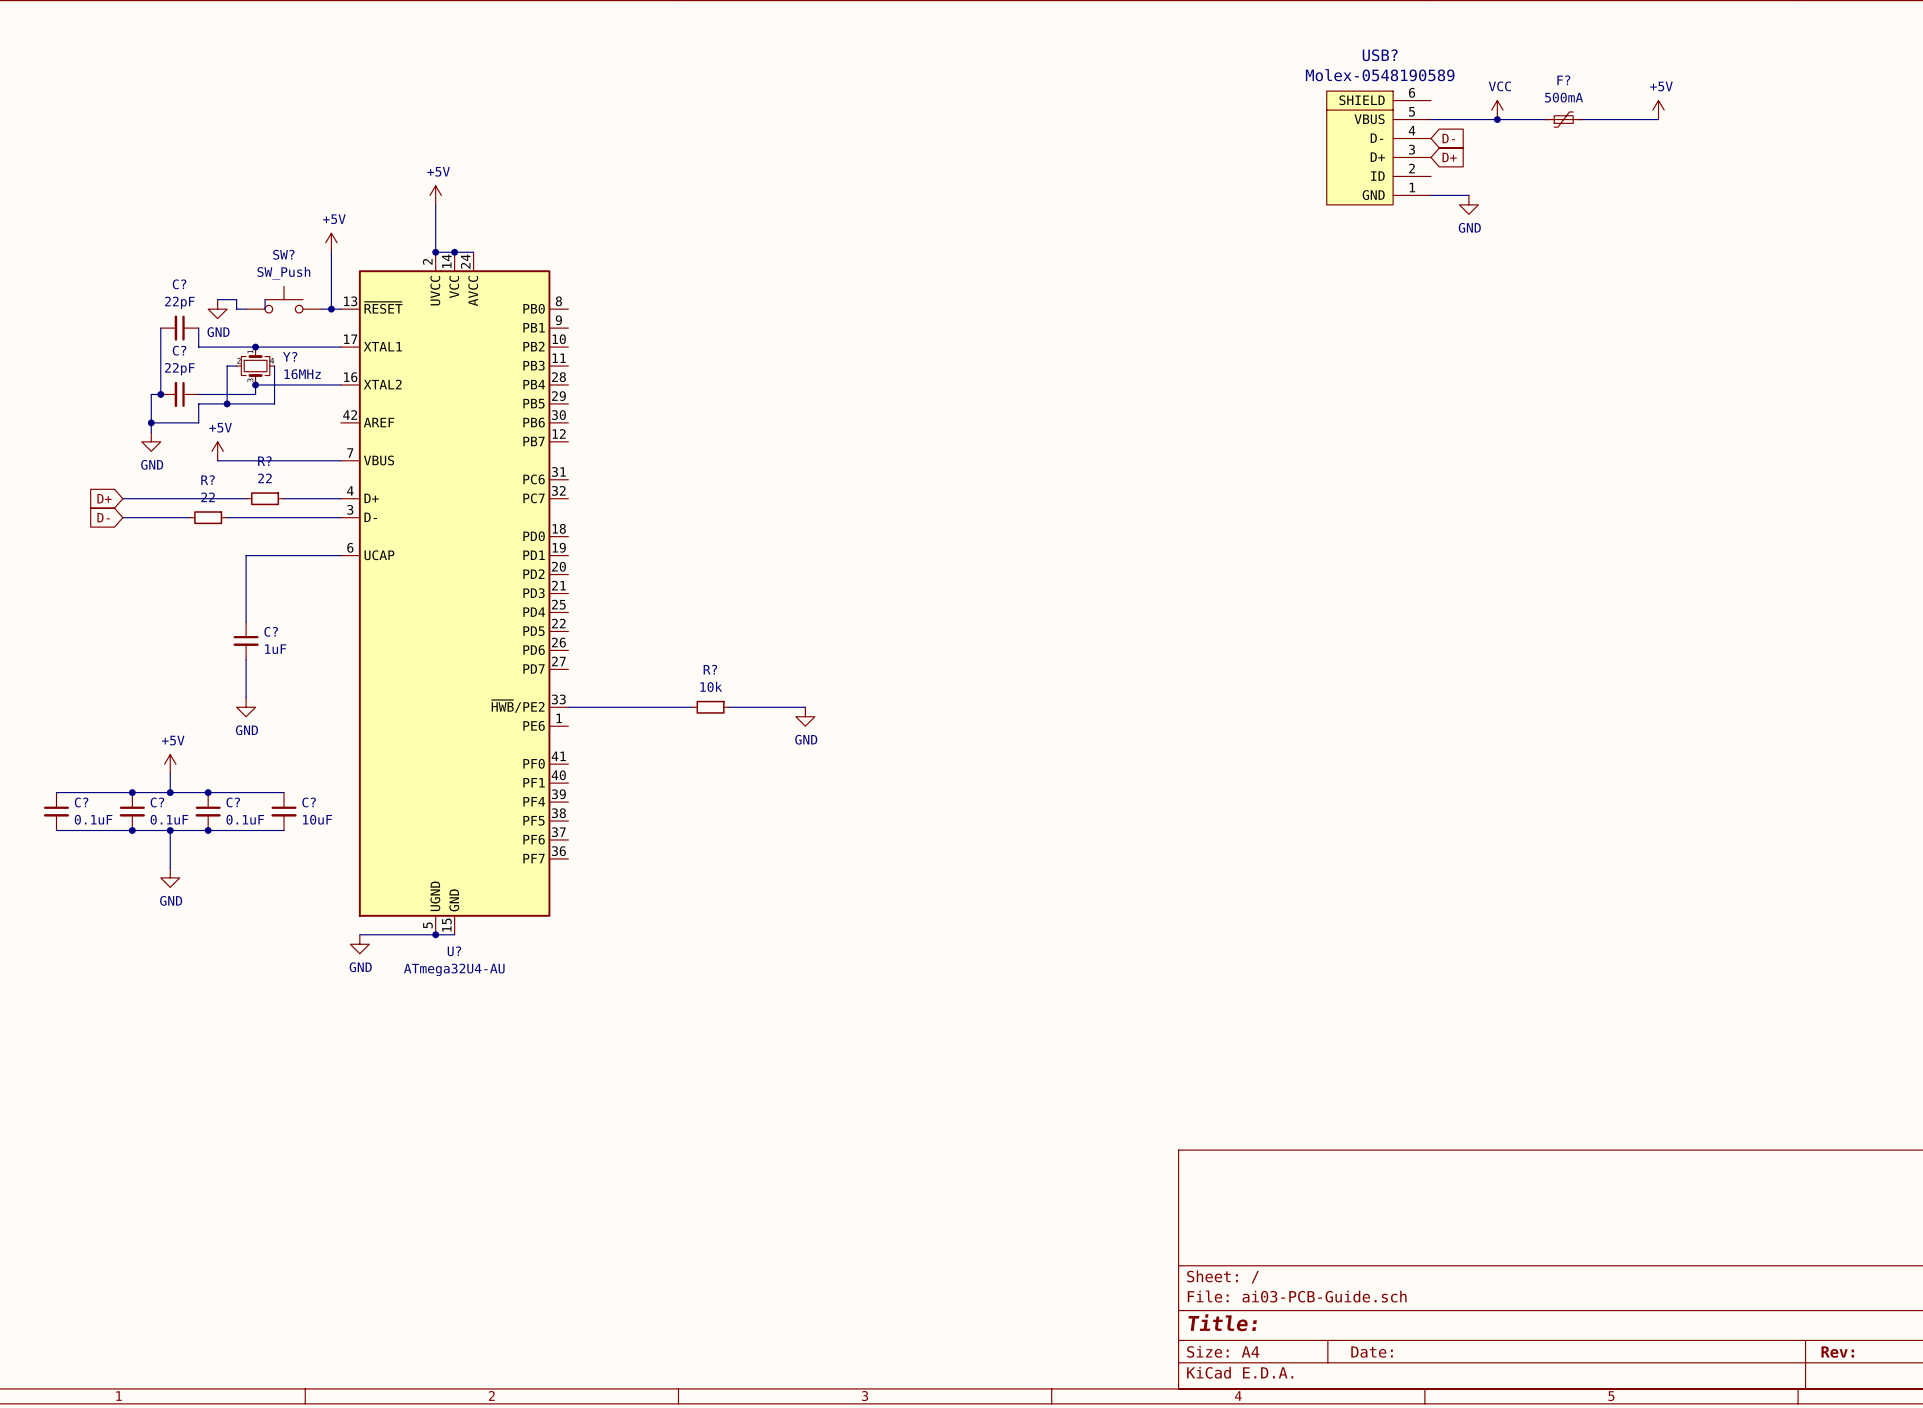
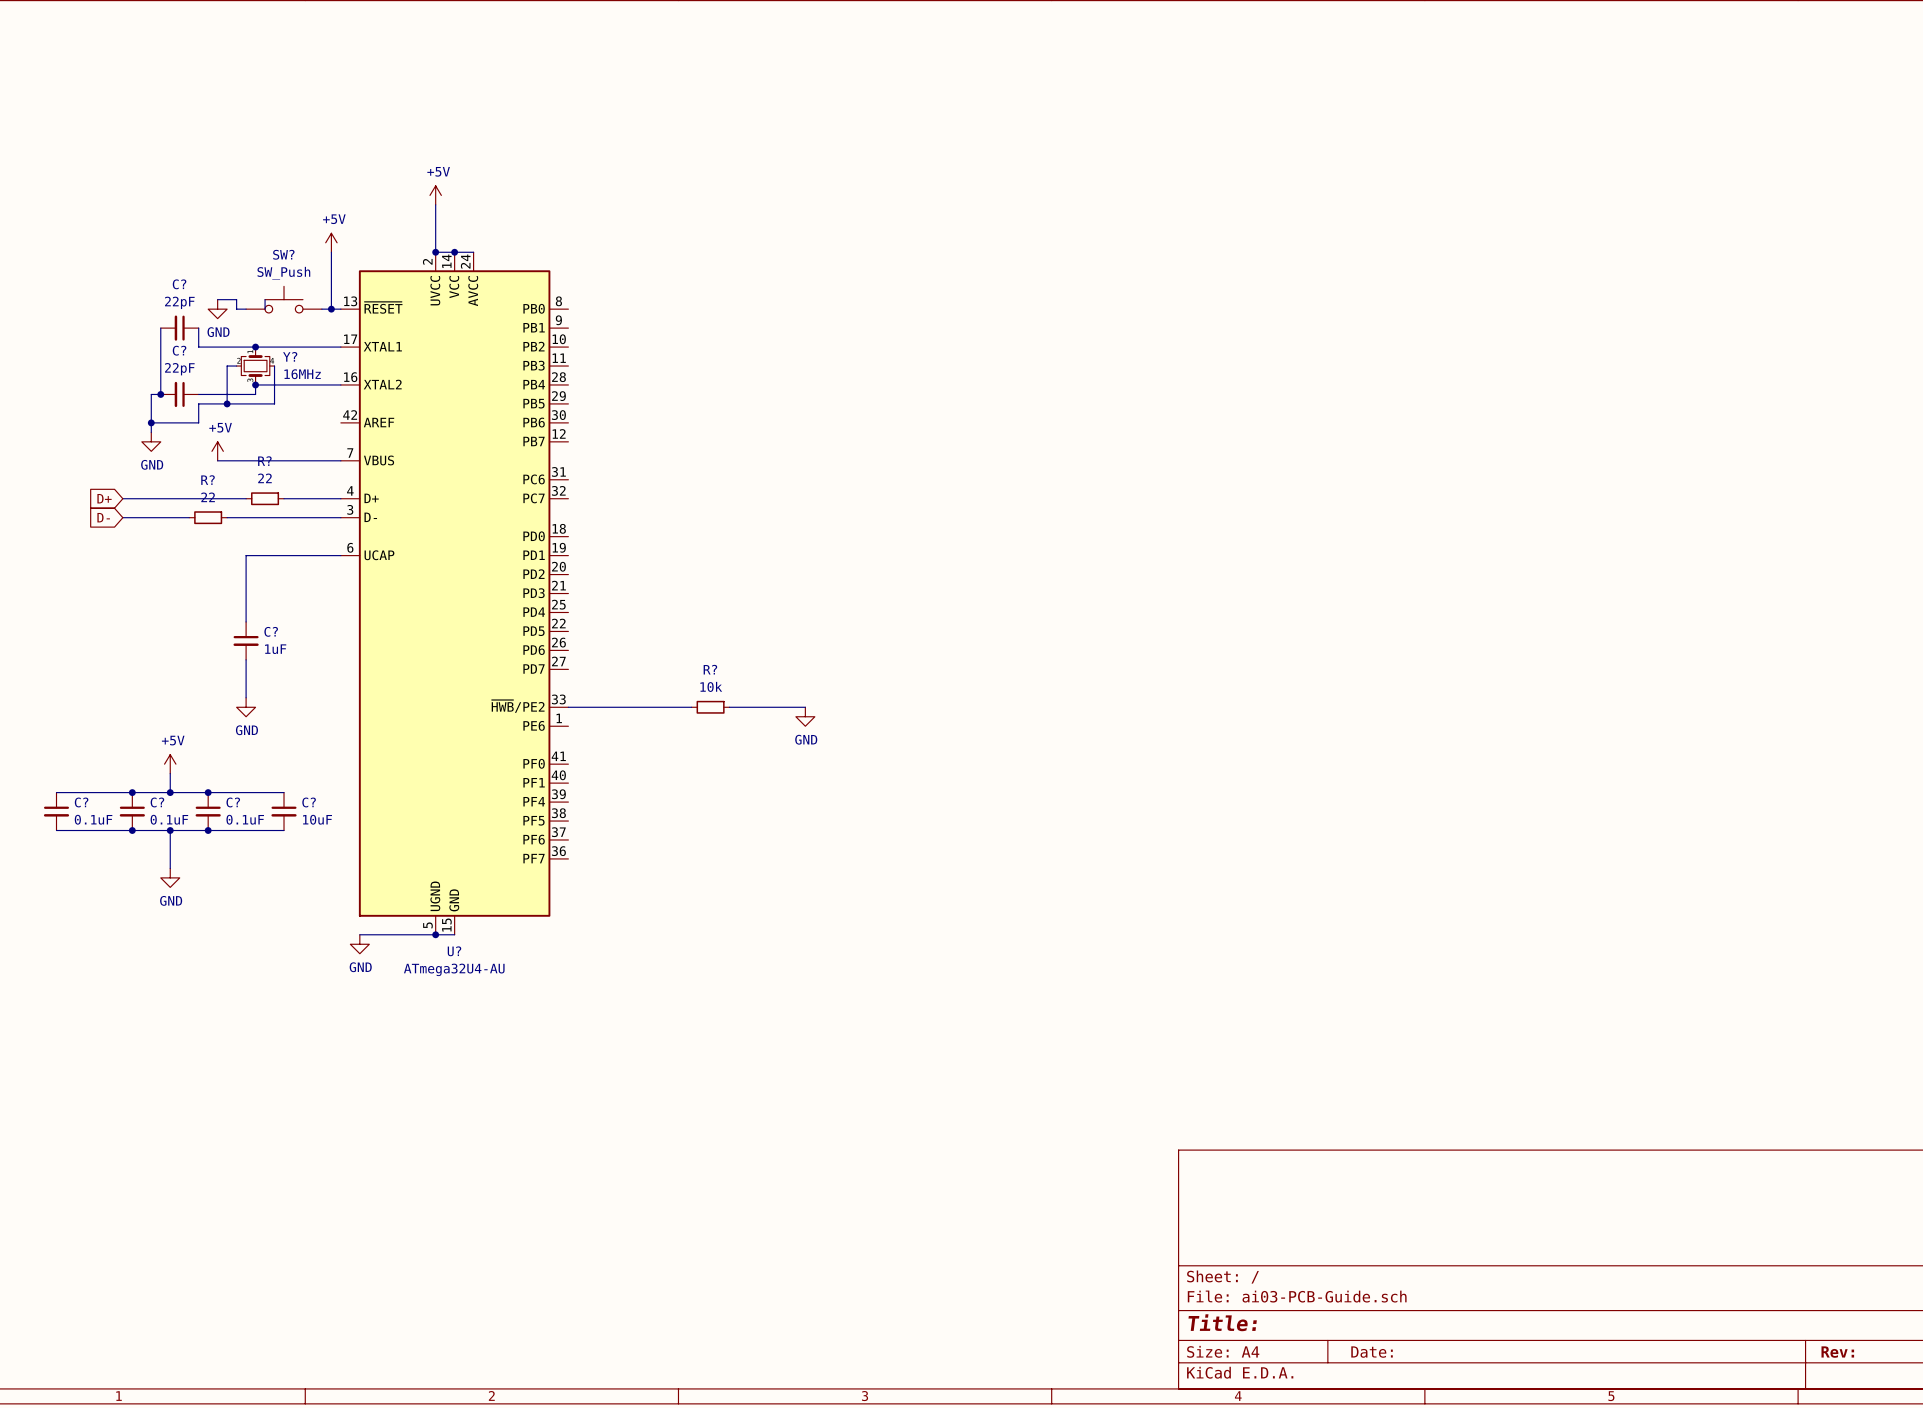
power symbol: VCC (1497, 110) -> none
power symbol: +5V (1658, 110) -> none
wire: (1431, 119) (1544, 119) -> none
junction: (1497, 119) -> none
F?: 500mA (1563, 119) -> none
wire: (1582, 119) (1658, 119) -> none
global label: D- (1448, 138) -> none
USB?: Molex-0548190589 (1378, 147) -> none
global label: D+ (1449, 157) -> none
wire: (1431, 195) (1468, 195) -> none
power symbol: GND (1468, 204) -> none

